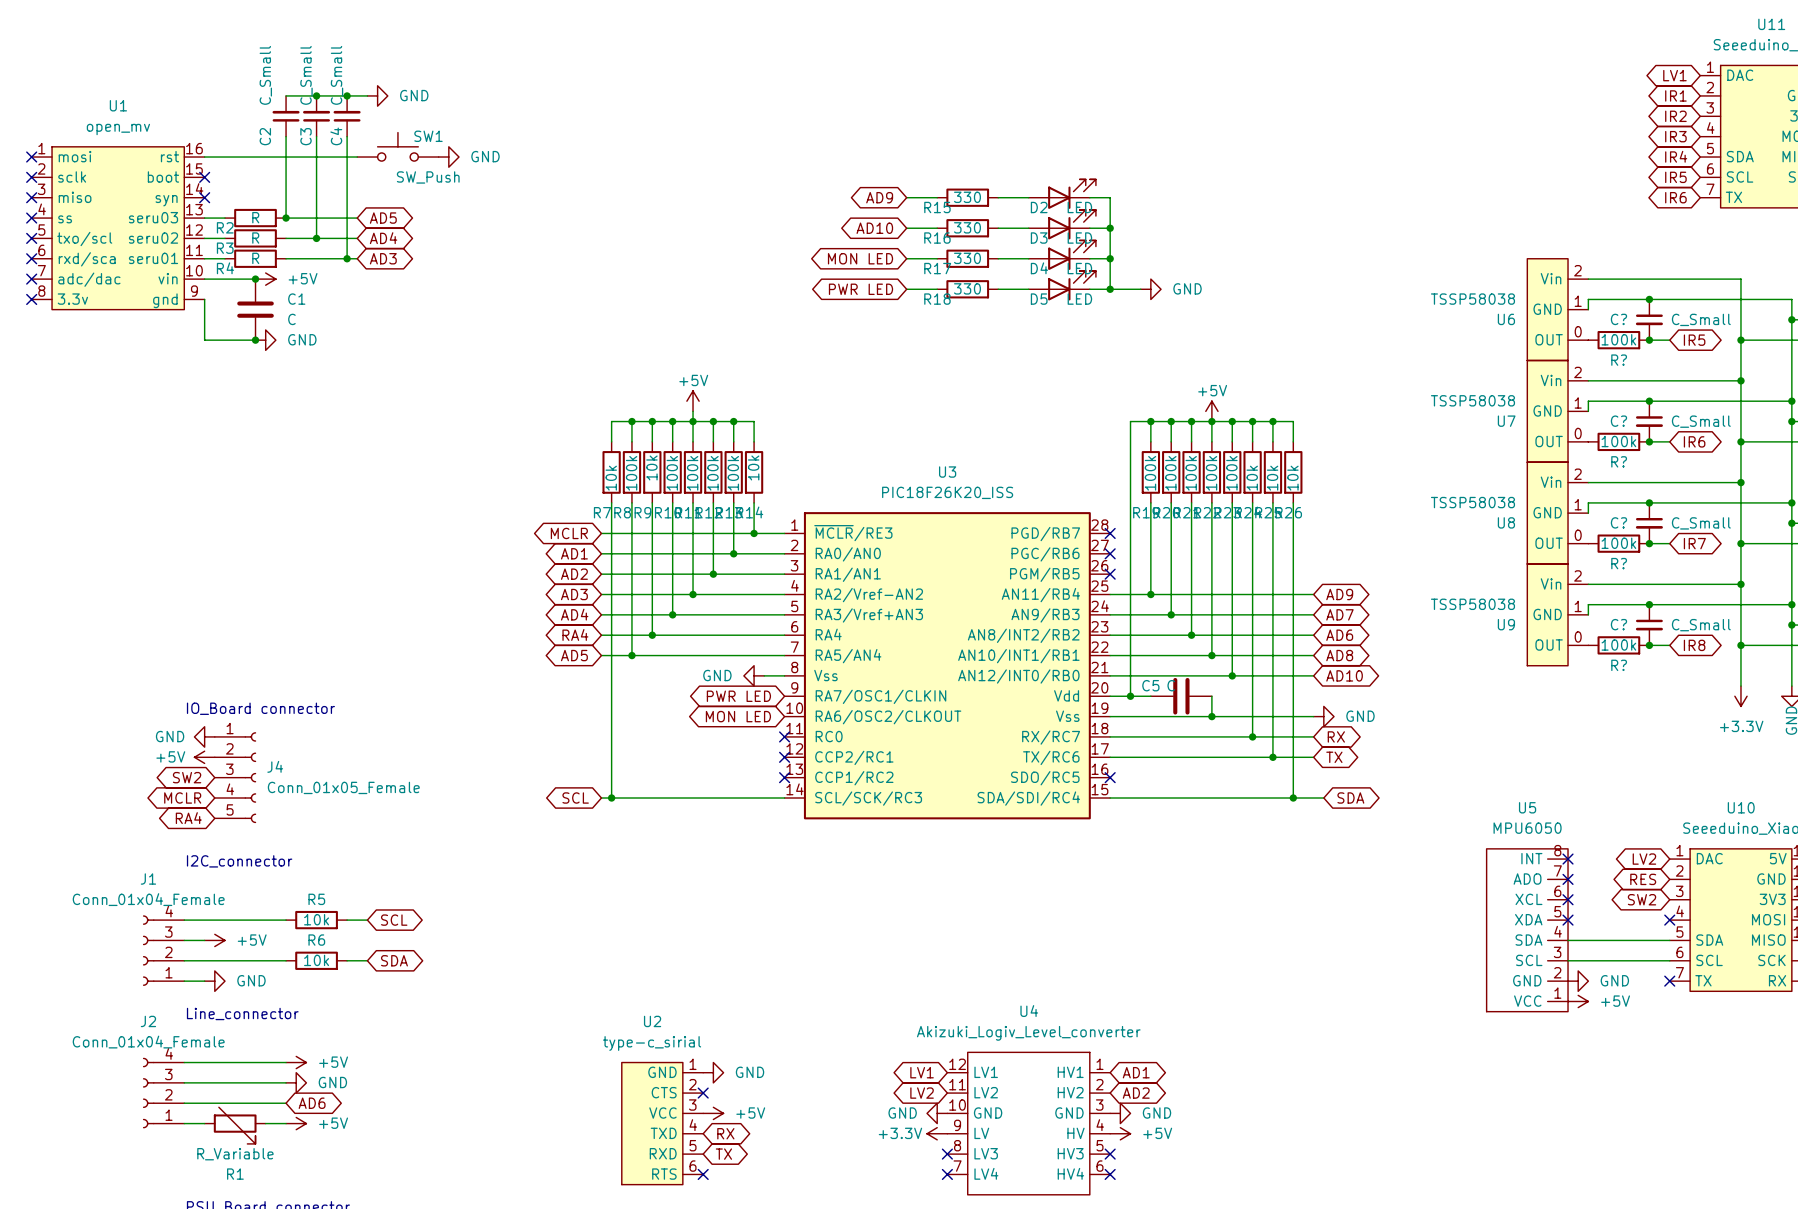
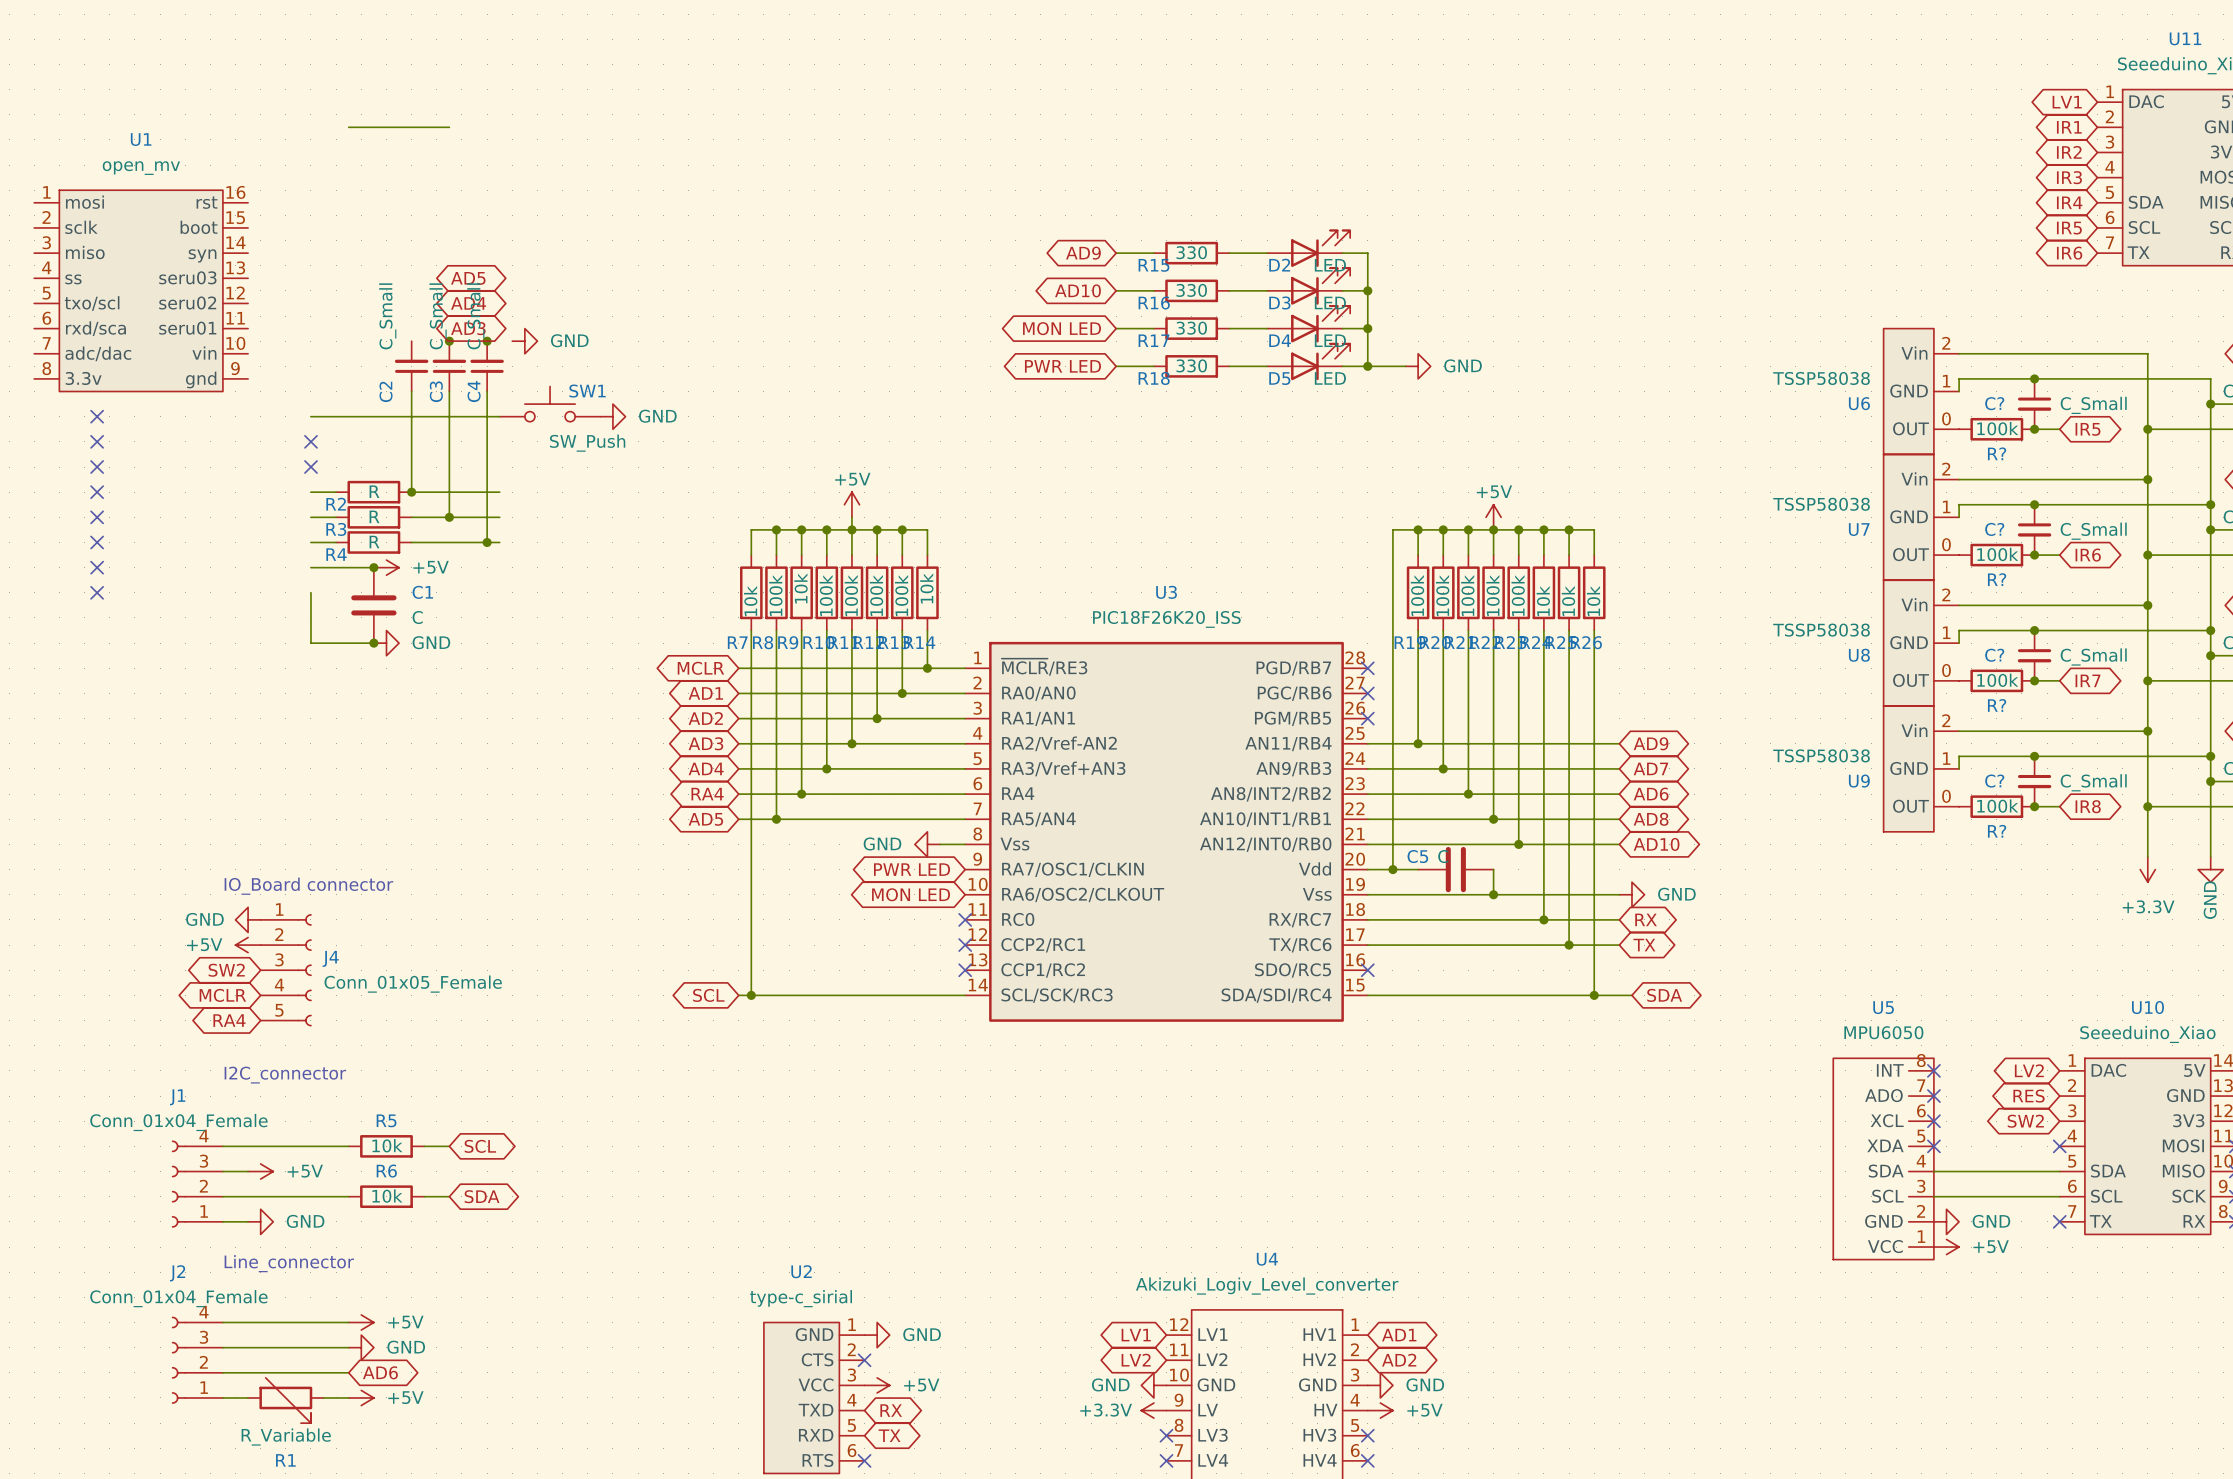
junction: (316, 95) -> none
junction: (347, 95) -> none
power symbol: GND (377, 95) -> none
C2 position: (286, 116) -> (411, 366)
C3 position: (316, 116) -> (449, 366)
C4 position: (347, 116) -> (487, 366)
wire: (286, 136) (286, 218) (357, 218) -> (411, 391) (411, 492) (499, 492)
wire: (316, 136) (316, 238) -> (449, 391) (449, 517)
wire: (347, 136) (347, 258) -> (487, 391) (487, 542)
SW1 position: (397, 146) -> (550, 404)
no-connect mark: (31, 157) -> none
wire: (204, 157) (357, 157) -> (310, 416) (499, 416)
power symbol: GND (448, 157) -> none
no-connect mark: (31, 177) -> none
no-connect mark: (204, 177) -> none
no-connect mark: (31, 197) -> none
no-connect mark: (204, 197) -> none
no-connect mark: (31, 218) -> none
wire: (204, 218) (224, 218) -> (310, 492) (336, 492)
R2 position: (255, 218) -> (373, 492)
junction: (286, 218) -> none
no-connect mark: (31, 238) -> none
wire: (204, 238) (224, 238) -> (310, 517) (336, 517)
R3 position: (255, 238) -> (373, 517)
wire: (286, 238) (357, 238) -> (411, 517) (499, 517)
junction: (316, 238) -> none
no-connect mark: (31, 258) -> none
wire: (204, 258) (224, 258) -> (310, 542) (336, 542)
R4 position: (255, 258) -> (373, 542)
wire: (286, 258) (357, 258) -> (411, 542) (499, 542)
junction position: (347, 258) -> (449, 341)
junction: none -> (487, 341)
power symbol: none -> GND (524, 341)
no-connect mark: (31, 279) -> none
wire: (204, 279) (255, 279) -> (310, 567) (373, 567)
junction: (255, 279) -> none
power symbol position: +5V (265, 279) -> +5V (386, 567)
no-connect mark: (31, 299) -> none
wire: (204, 299) (204, 340) (255, 340) -> (310, 592) (310, 643) (373, 643)
C1 position: (255, 309) -> (373, 605)
no-connect mark: none -> (97, 416)
power symbol: none -> GND (612, 416)
junction: (255, 340) -> none
power symbol: GND (265, 340) -> none
no-connect mark: none -> (97, 441)
no-connect mark: none -> (310, 441)
no-connect mark: none -> (97, 467)
no-connect mark: none -> (310, 467)
no-connect mark: none -> (97, 492)
junction: none -> (411, 492)
no-connect mark: none -> (97, 517)
junction: none -> (449, 517)
no-connect mark: none -> (97, 542)
junction: none -> (487, 542)
no-connect mark: none -> (97, 567)
junction: none -> (373, 567)
no-connect mark: none -> (97, 592)
junction: none -> (373, 643)
power symbol: none -> GND (386, 643)

